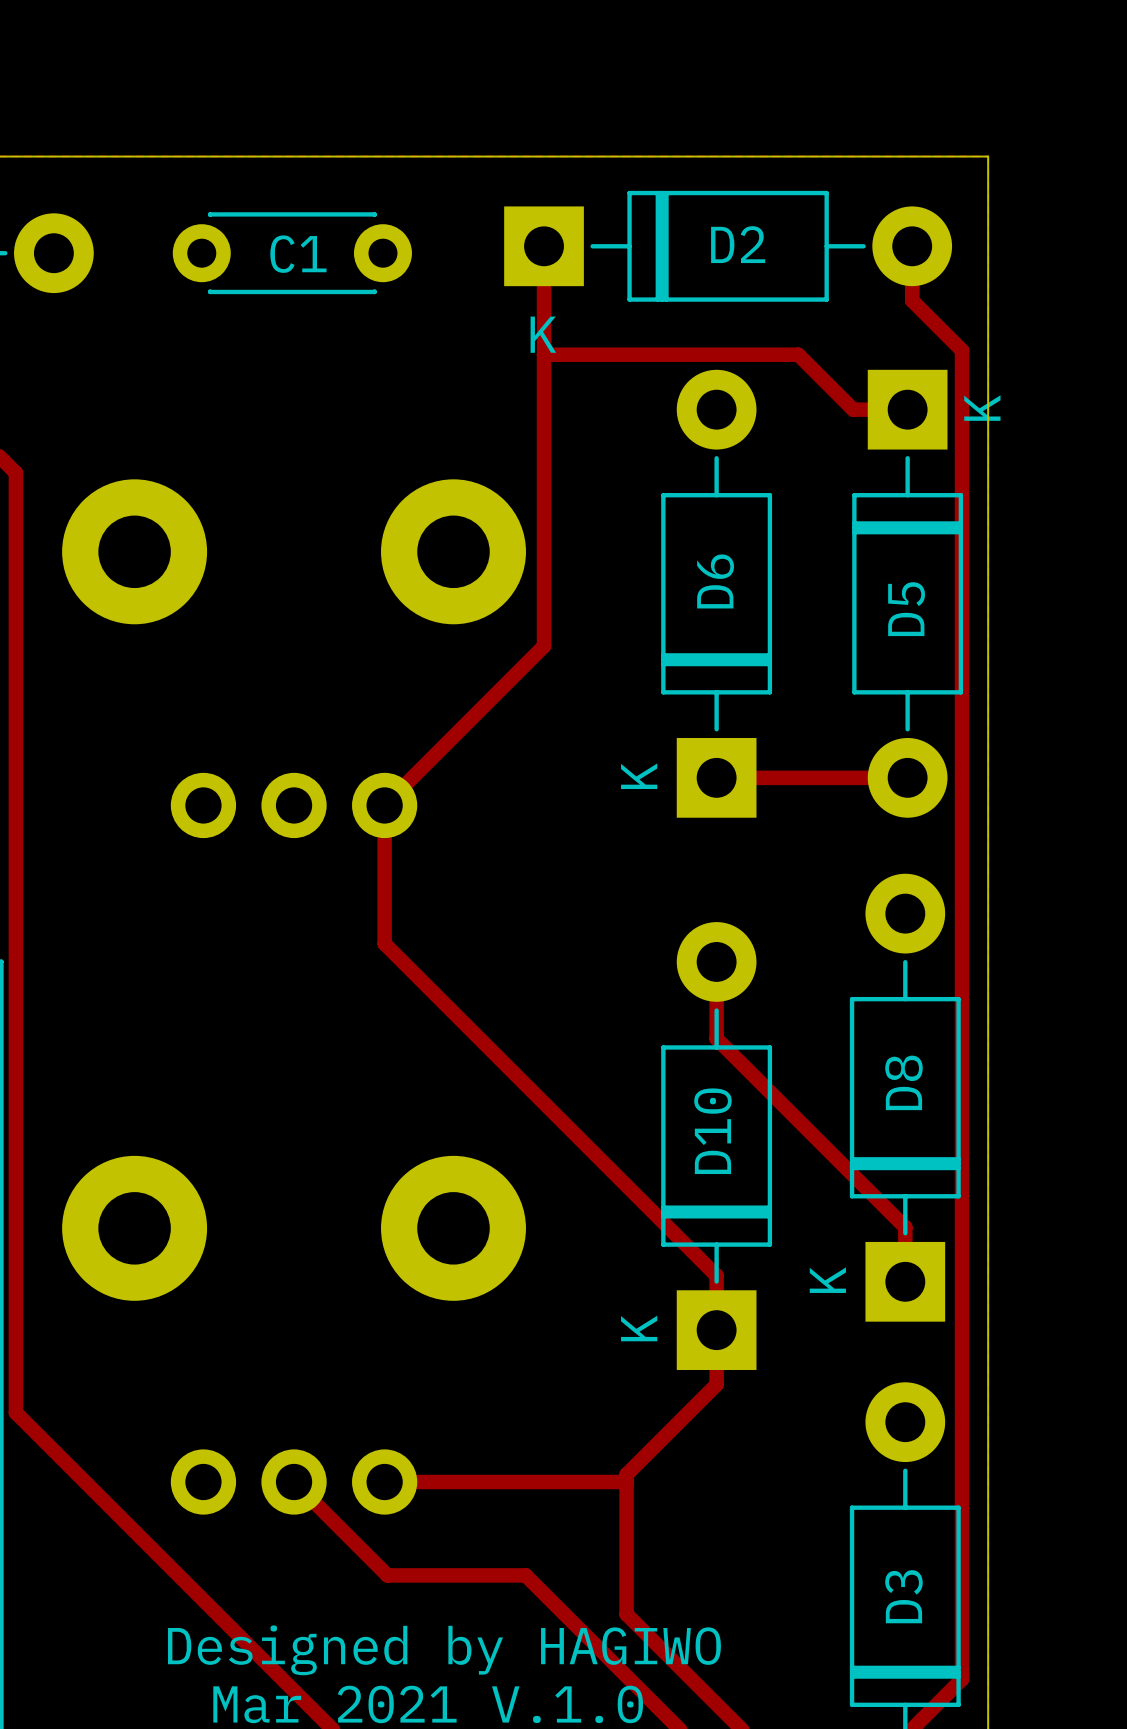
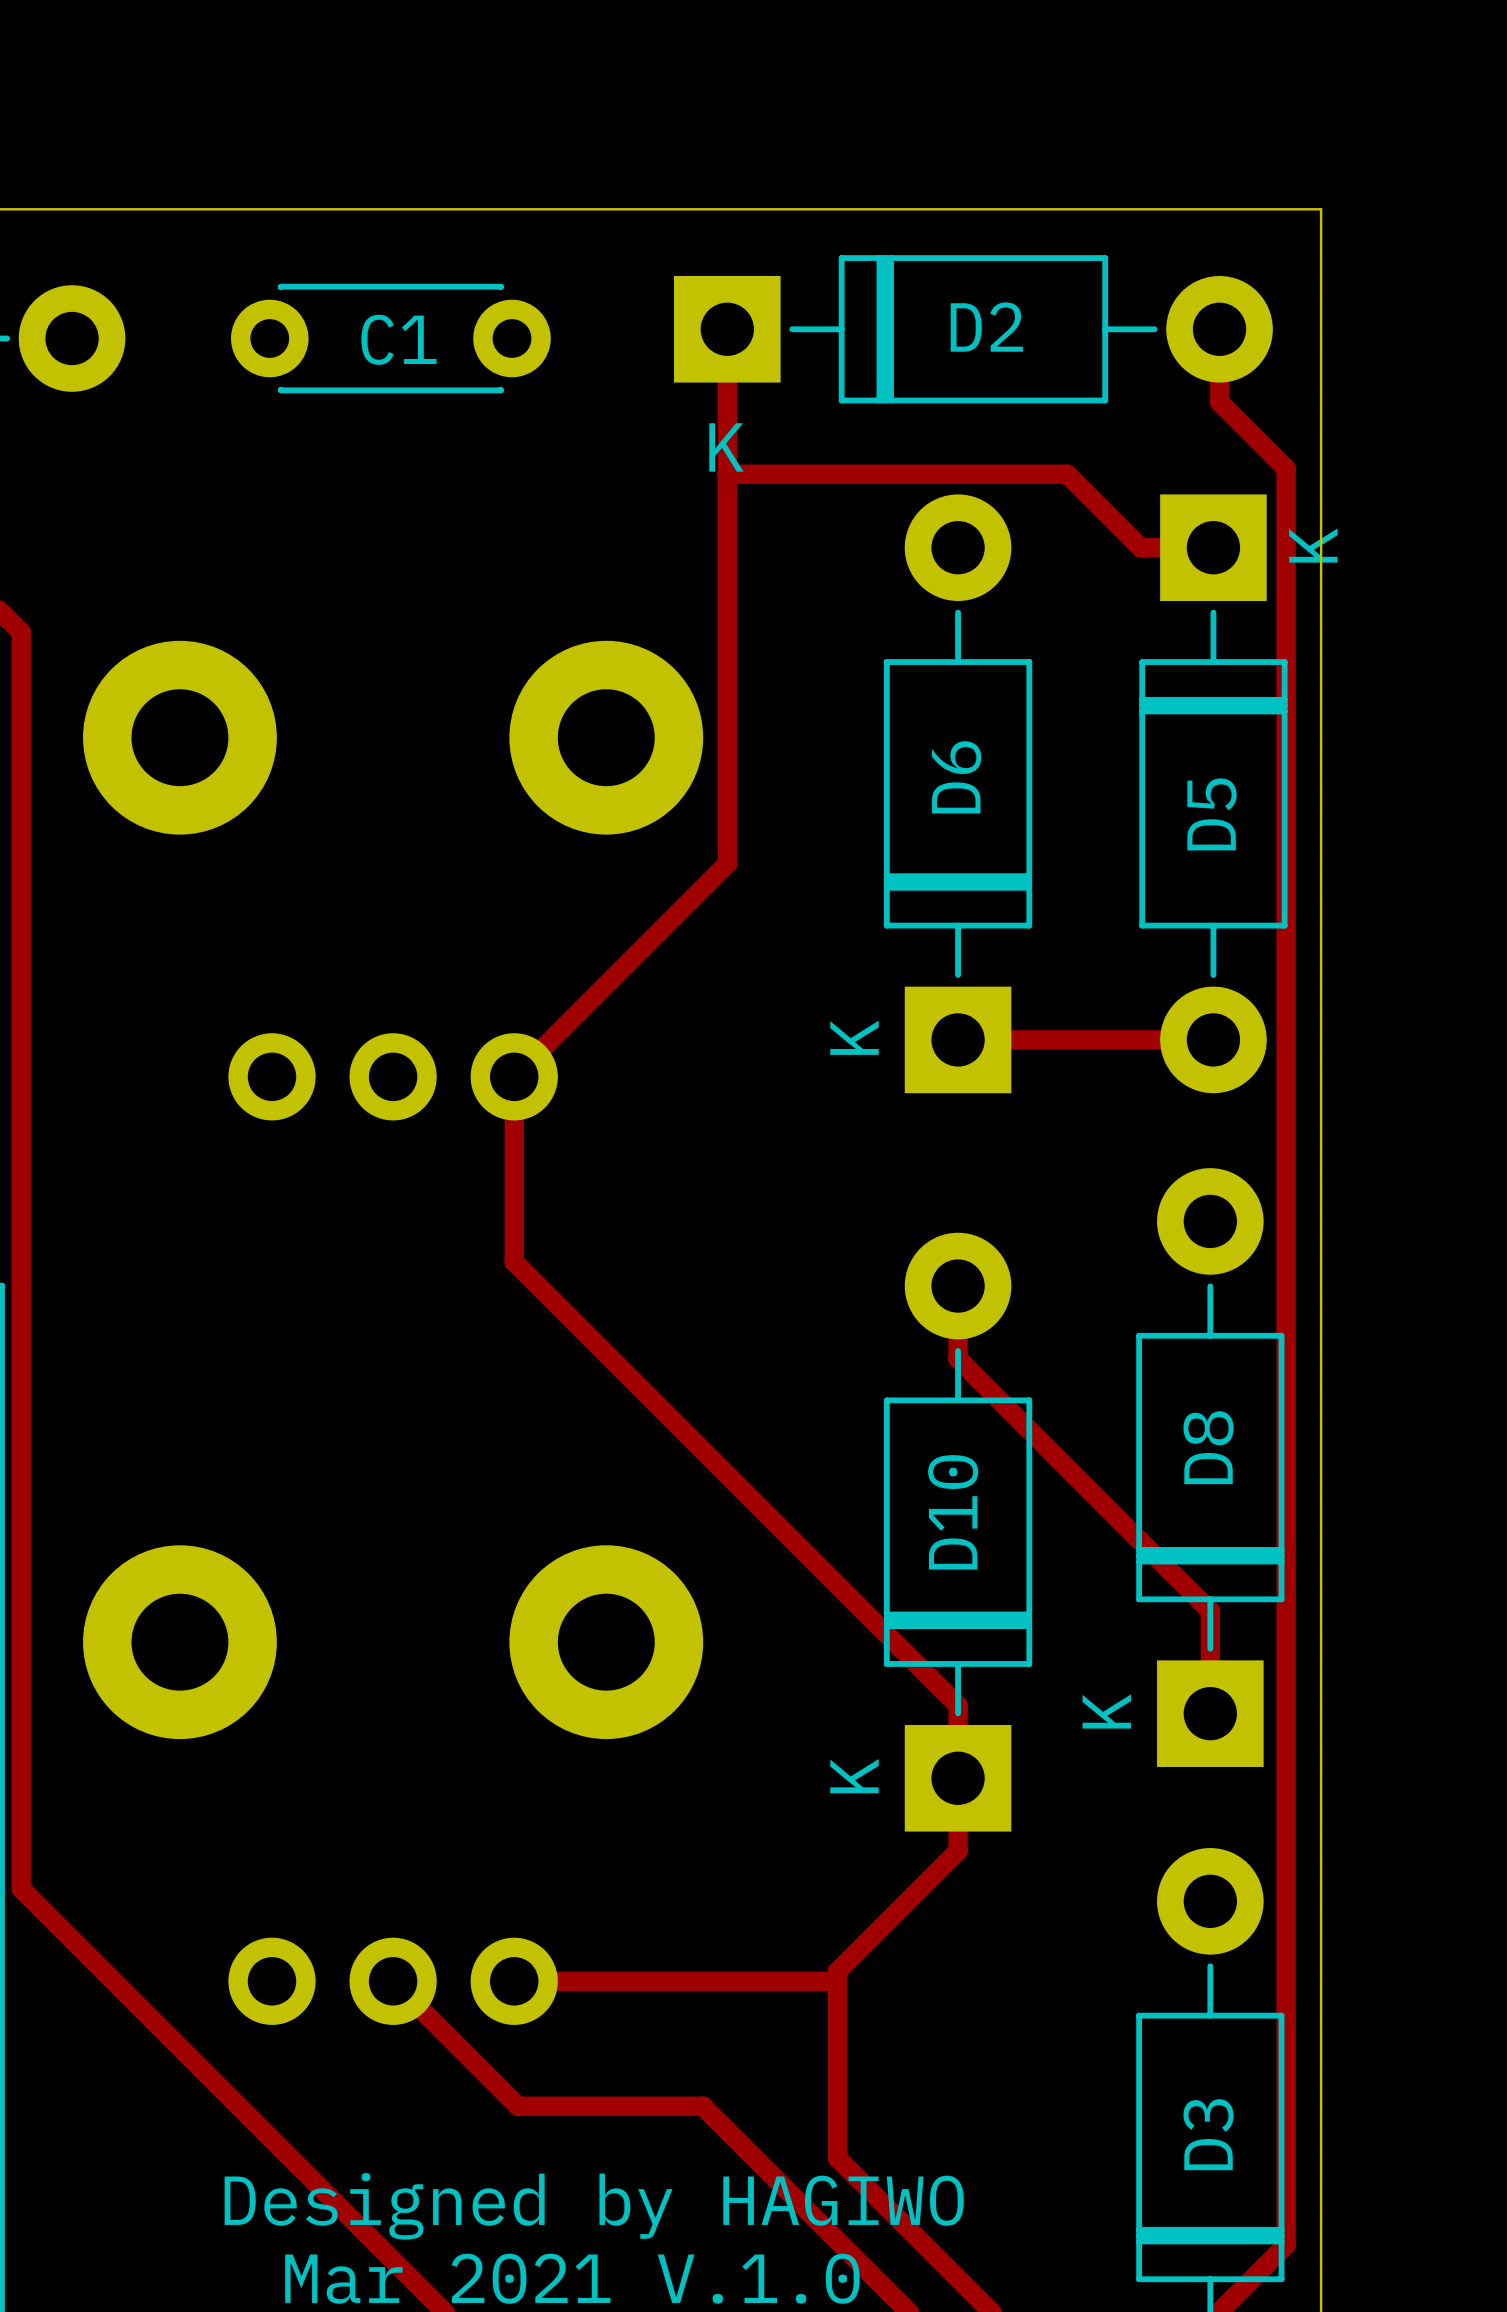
track: (716, 1016) (716, 1038) (905, 1227) -> (958, 1358) (1210, 1610) (1210, 1640)

